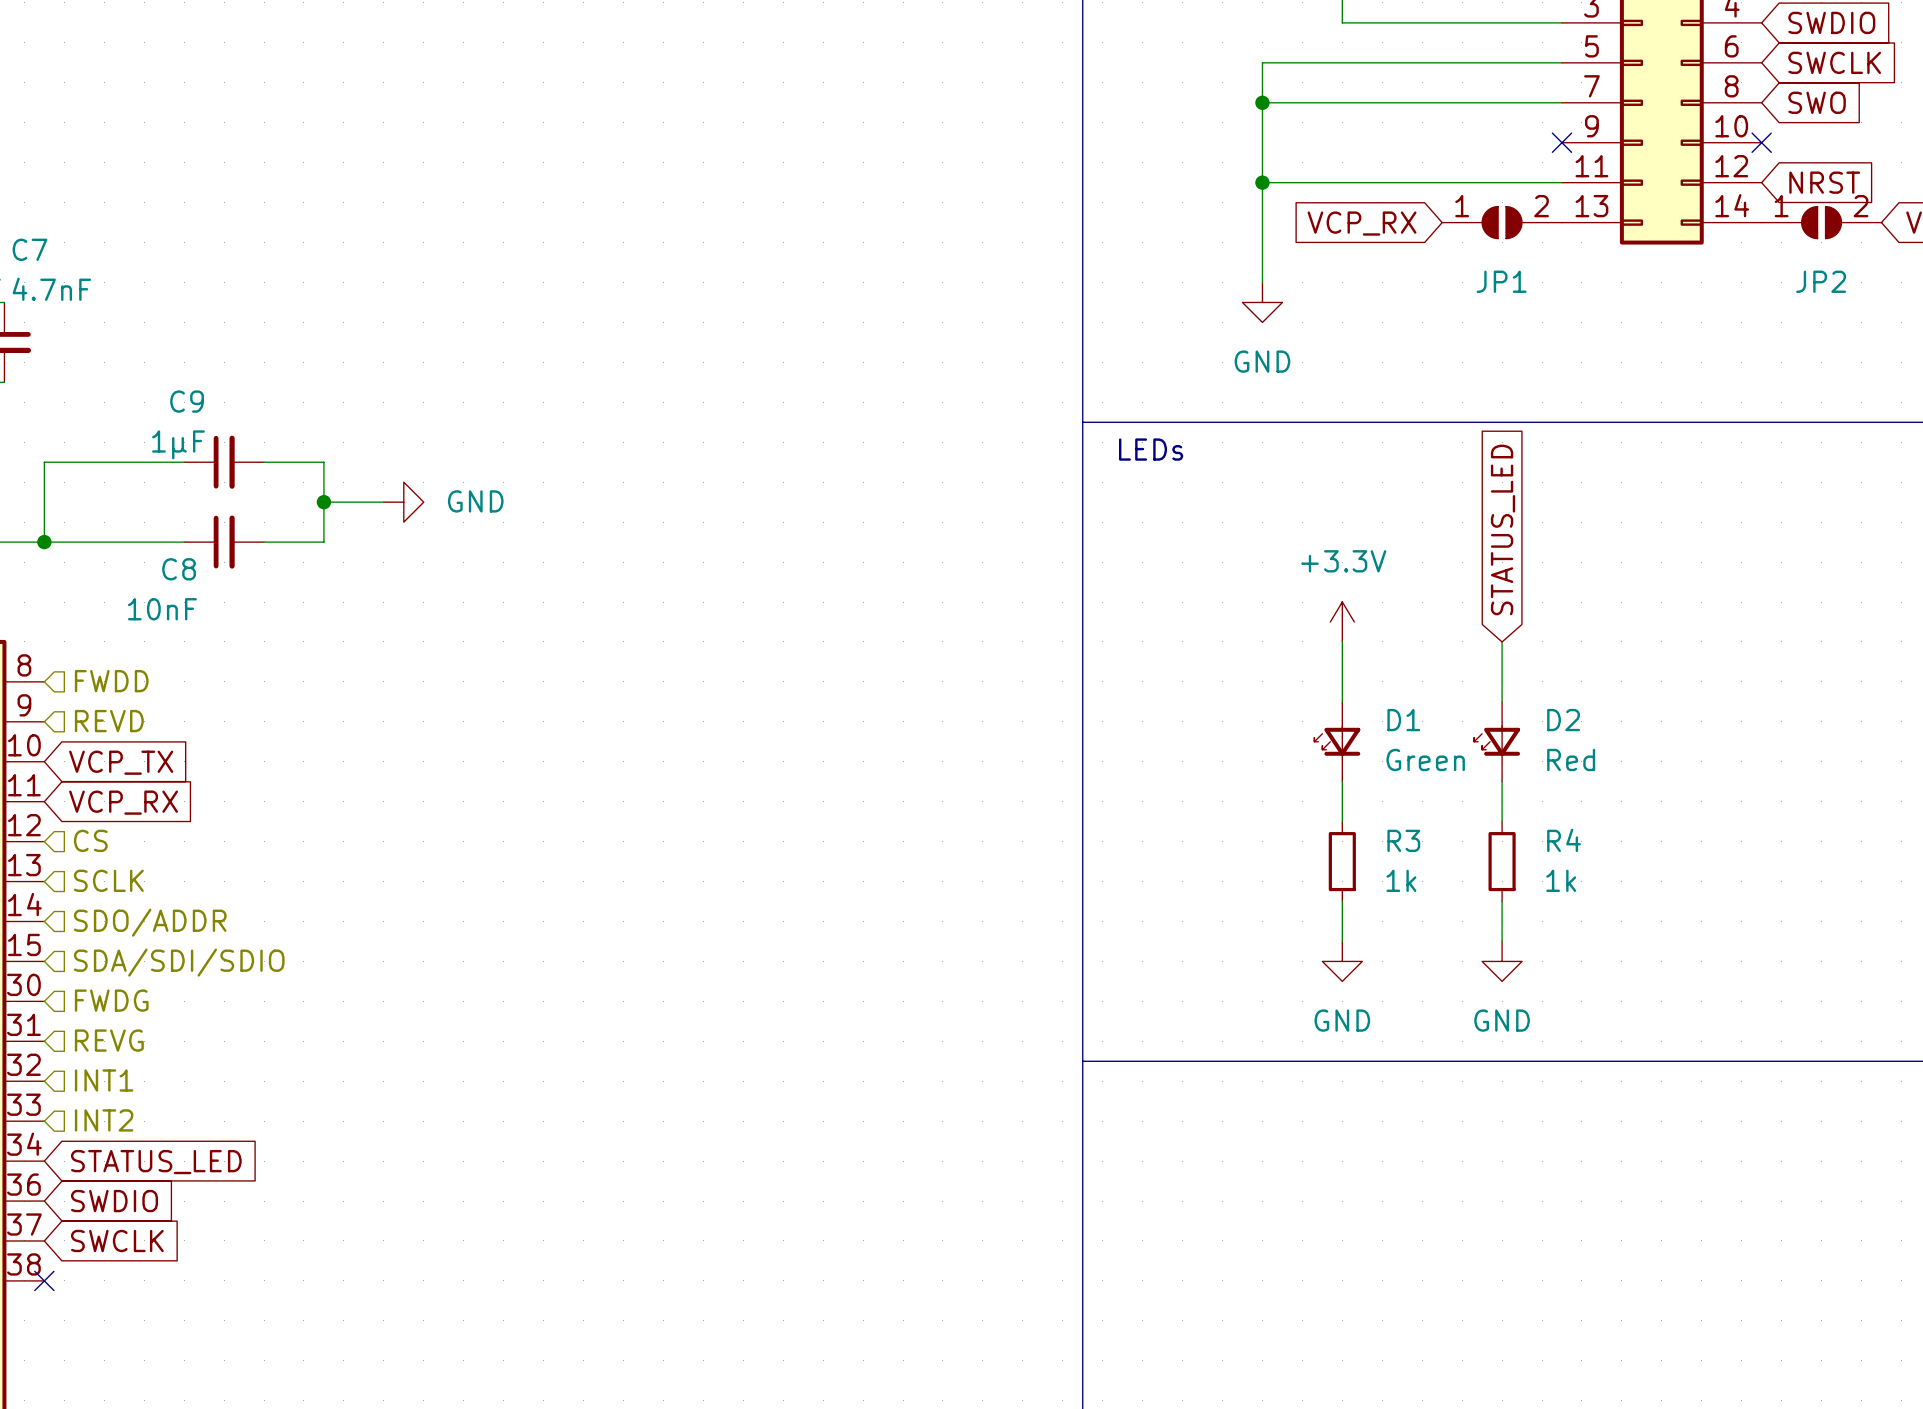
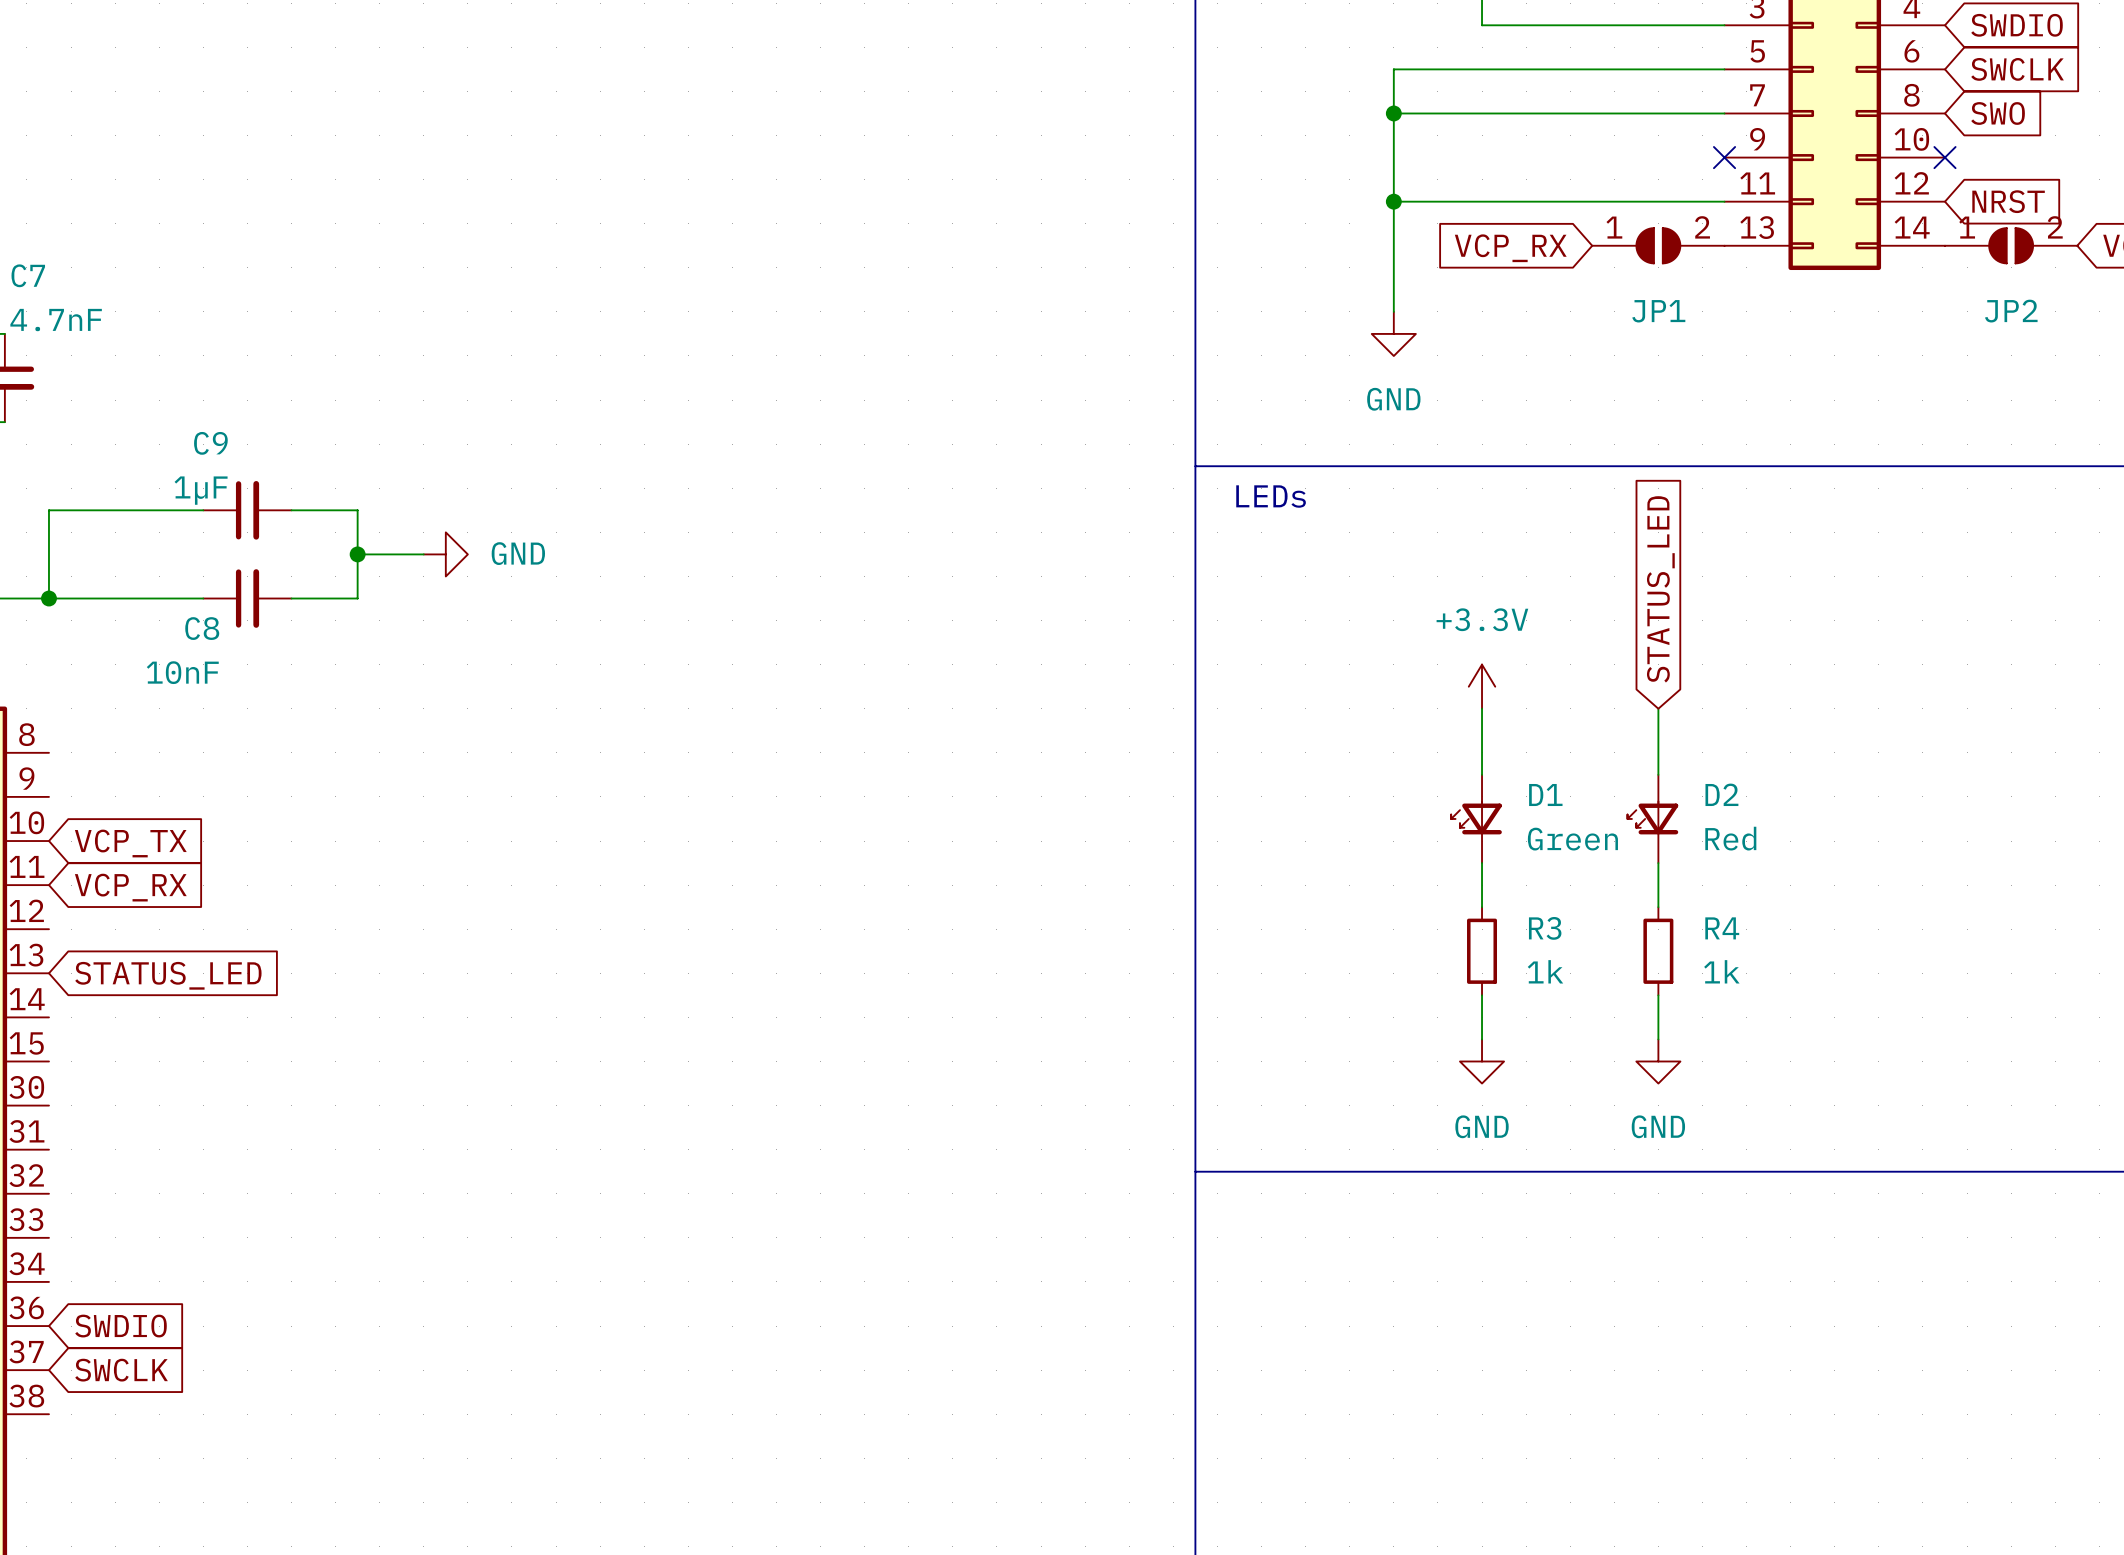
hierarchical label: FWDD (111, 681) -> none
hierarchical label: REVD (109, 721) -> none
hierarchical label: CS (90, 840) -> none
hierarchical label: SCLK (108, 880) -> none
hierarchical label: SDO/ADDR (150, 922) -> none
hierarchical label: SDA/SDI/SDIO (179, 962) -> none
hierarchical label: FWDG (111, 1000) -> none
hierarchical label: REVG (109, 1040) -> none
hierarchical label: INT1 (104, 1080) -> none
hierarchical label: INT2 (104, 1120) -> none
global label position: STATUS_LED (156, 1162) -> STATUS_LED (168, 975)
no-connect mark: (44, 1280) -> none

